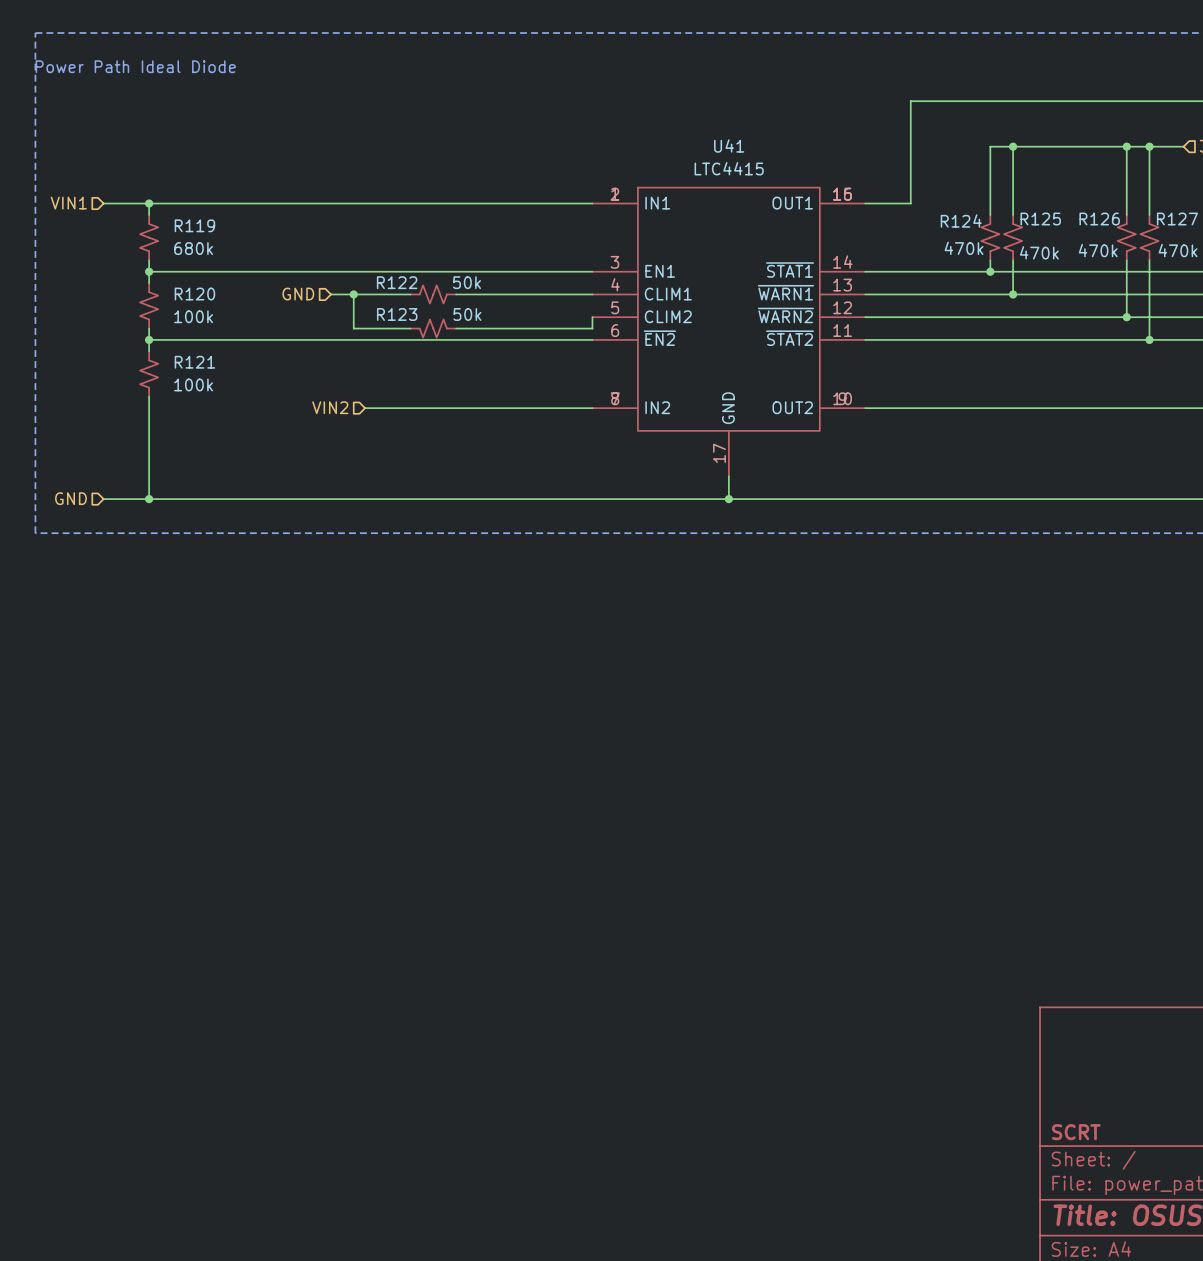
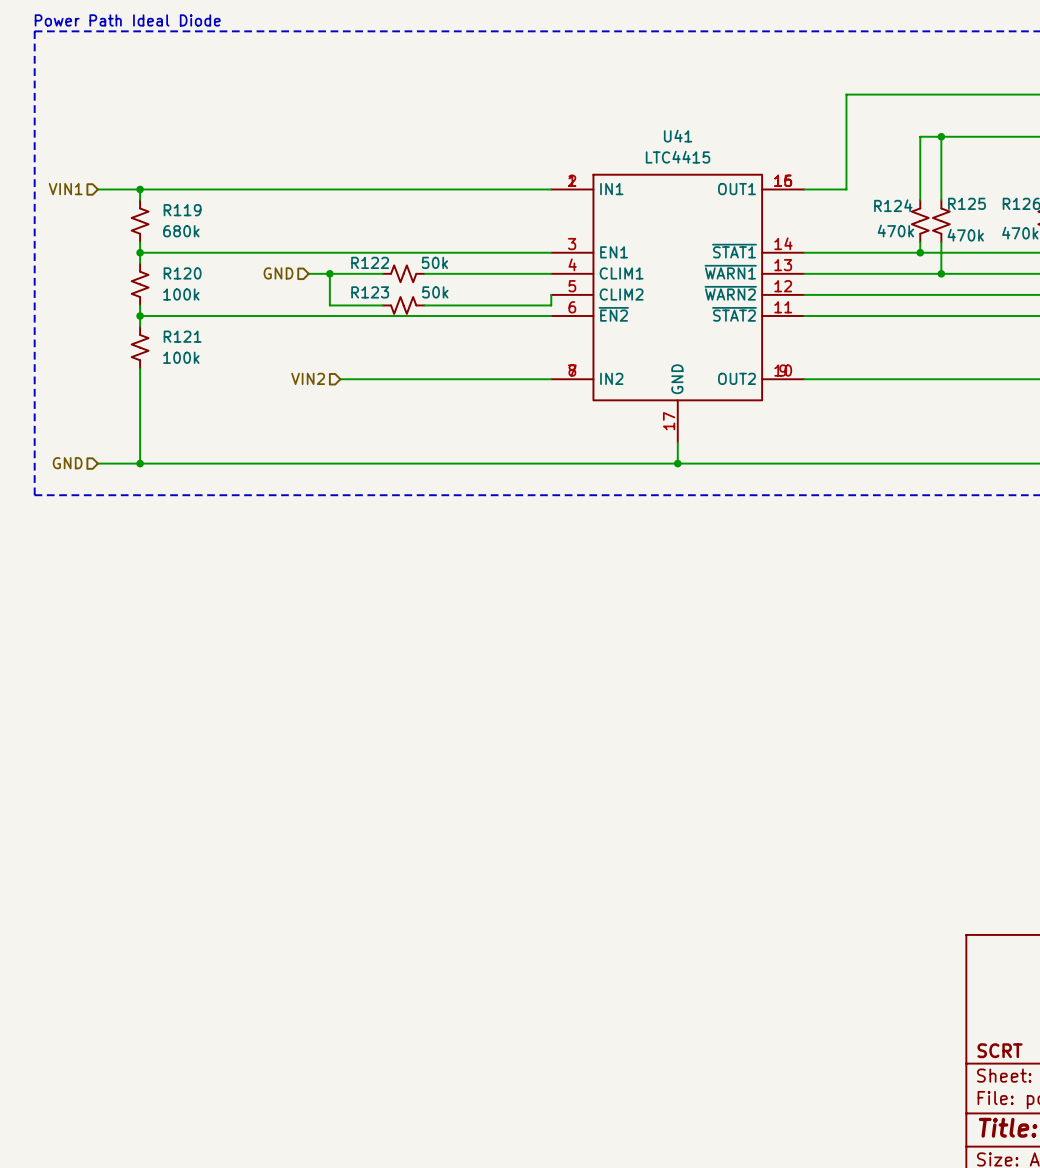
text position: Power Path Ideal Diode (135, 66) -> Power Path Ideal Diode (127, 20)

